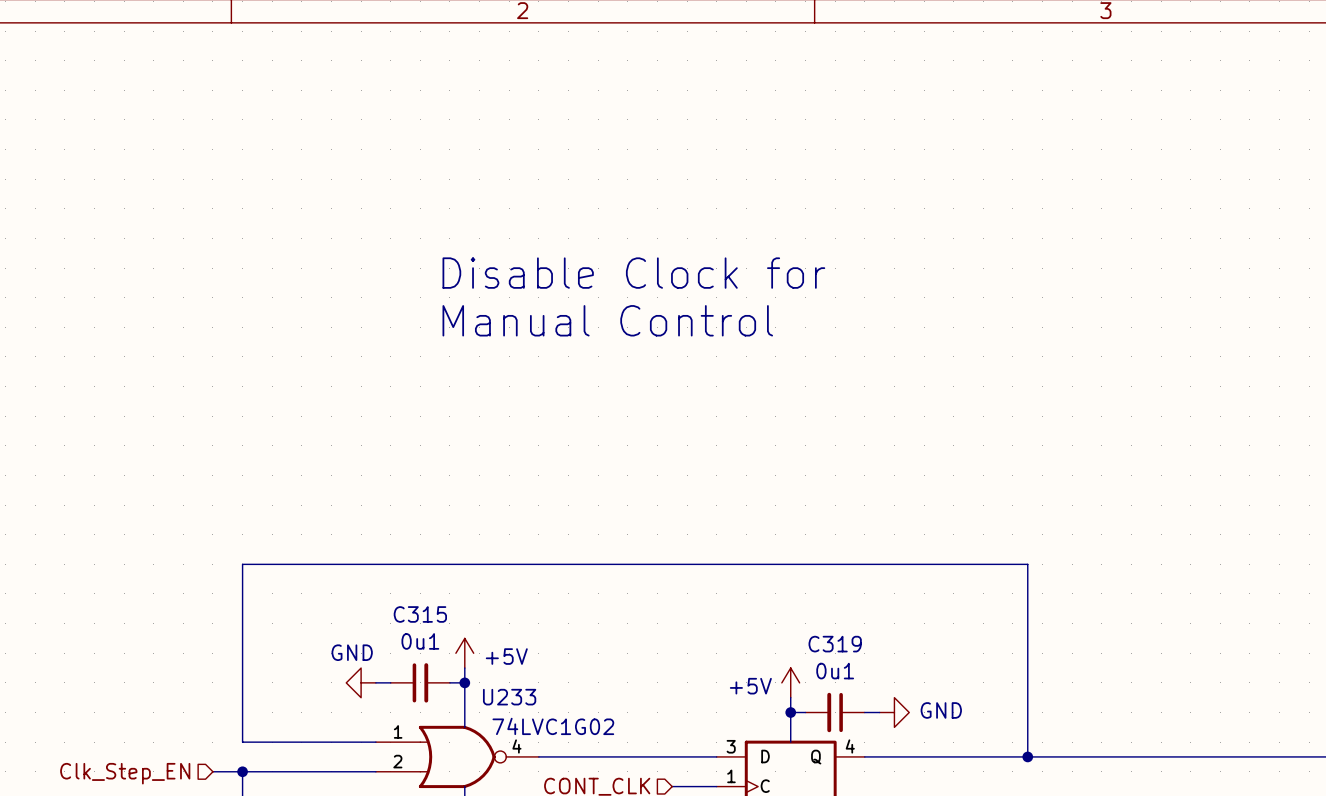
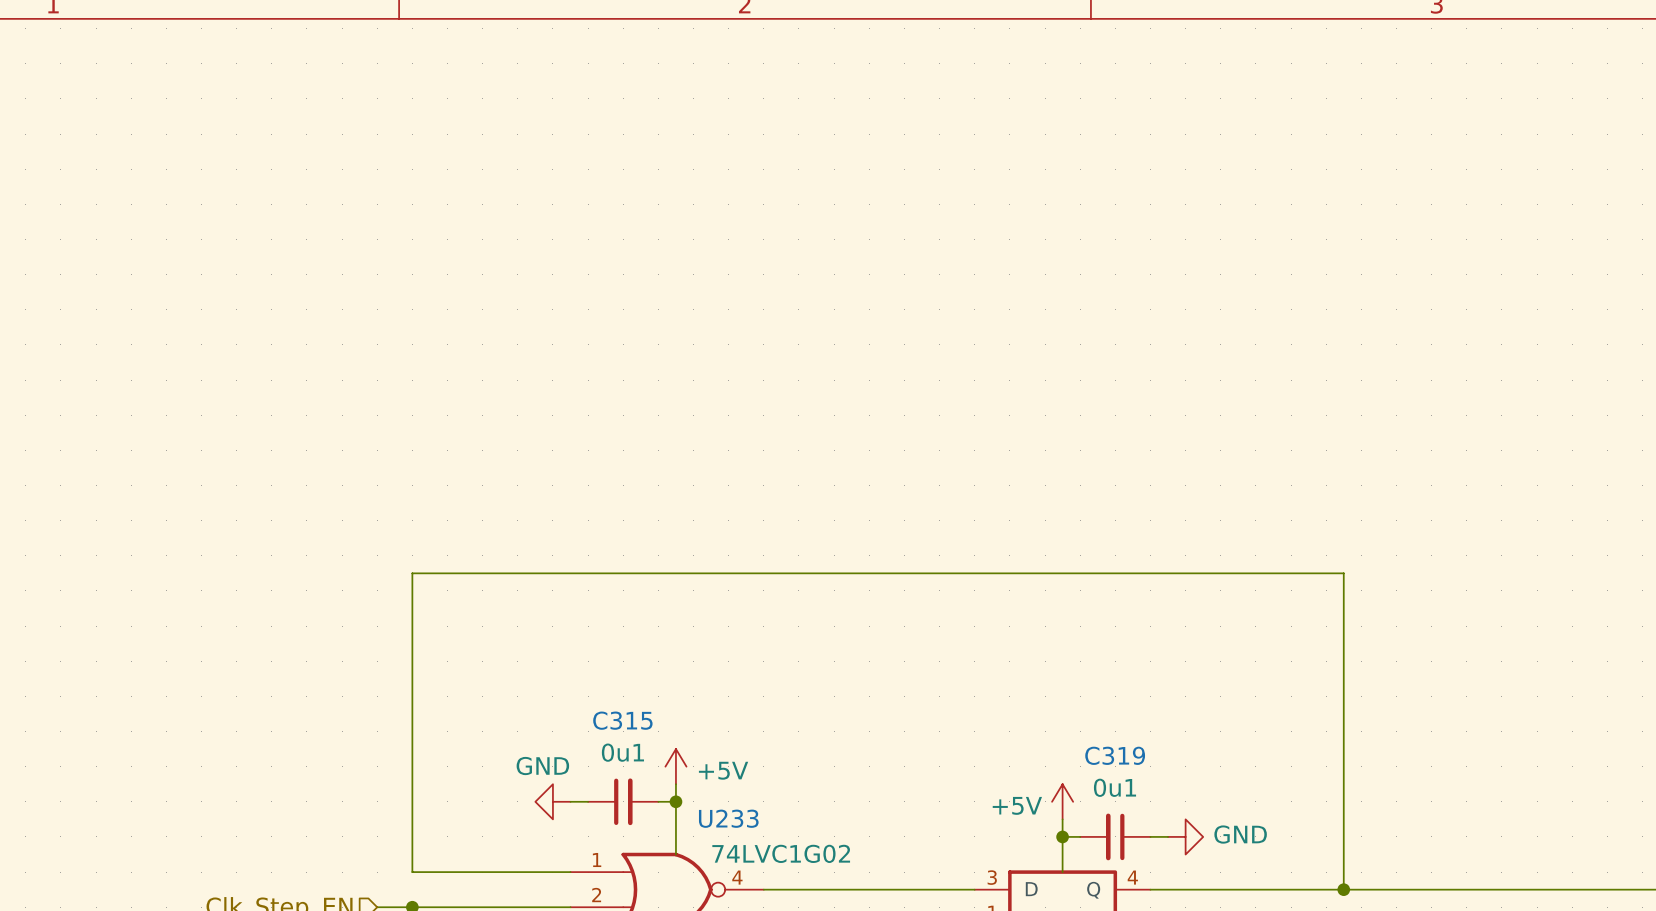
text: Disable Clock for (633, 273) -> none
text: Manual Control (607, 320) -> none
wire: (242, 564) (1027, 564) -> (412, 661) (412, 573) (1343, 573) (1343, 661)

